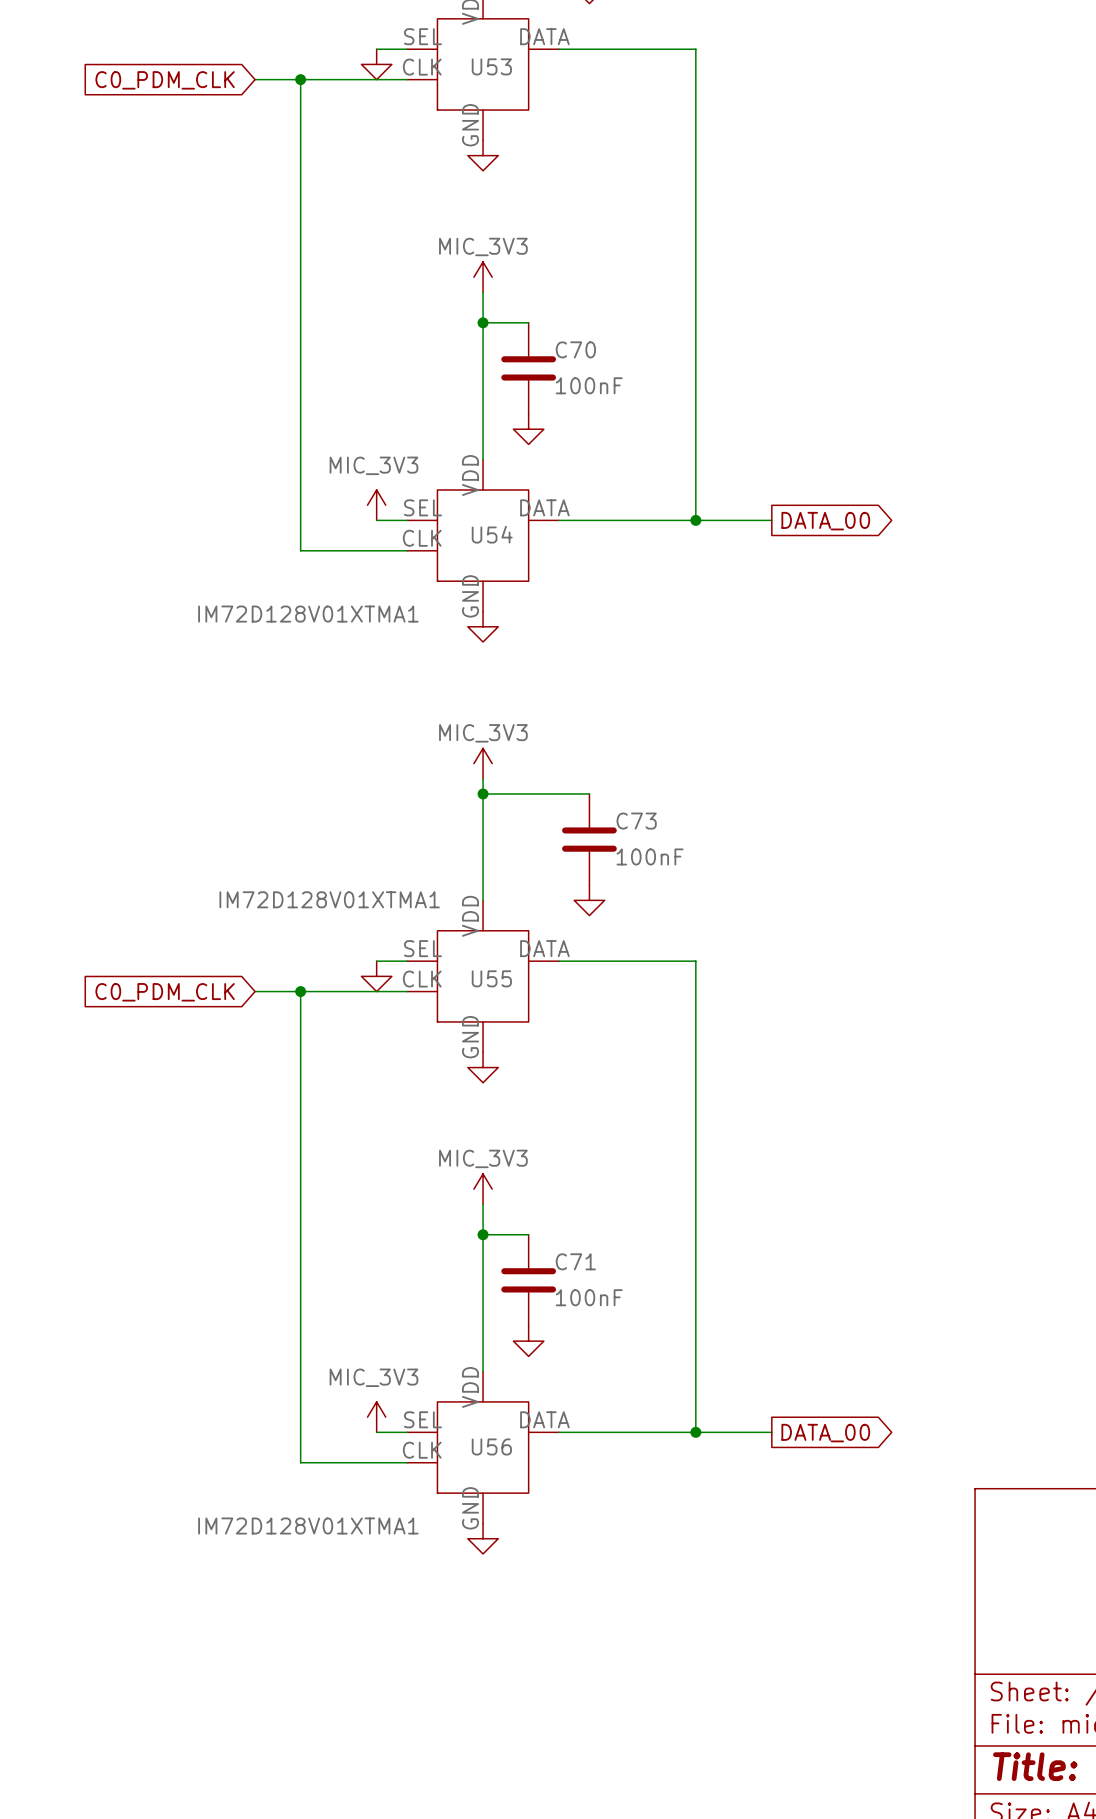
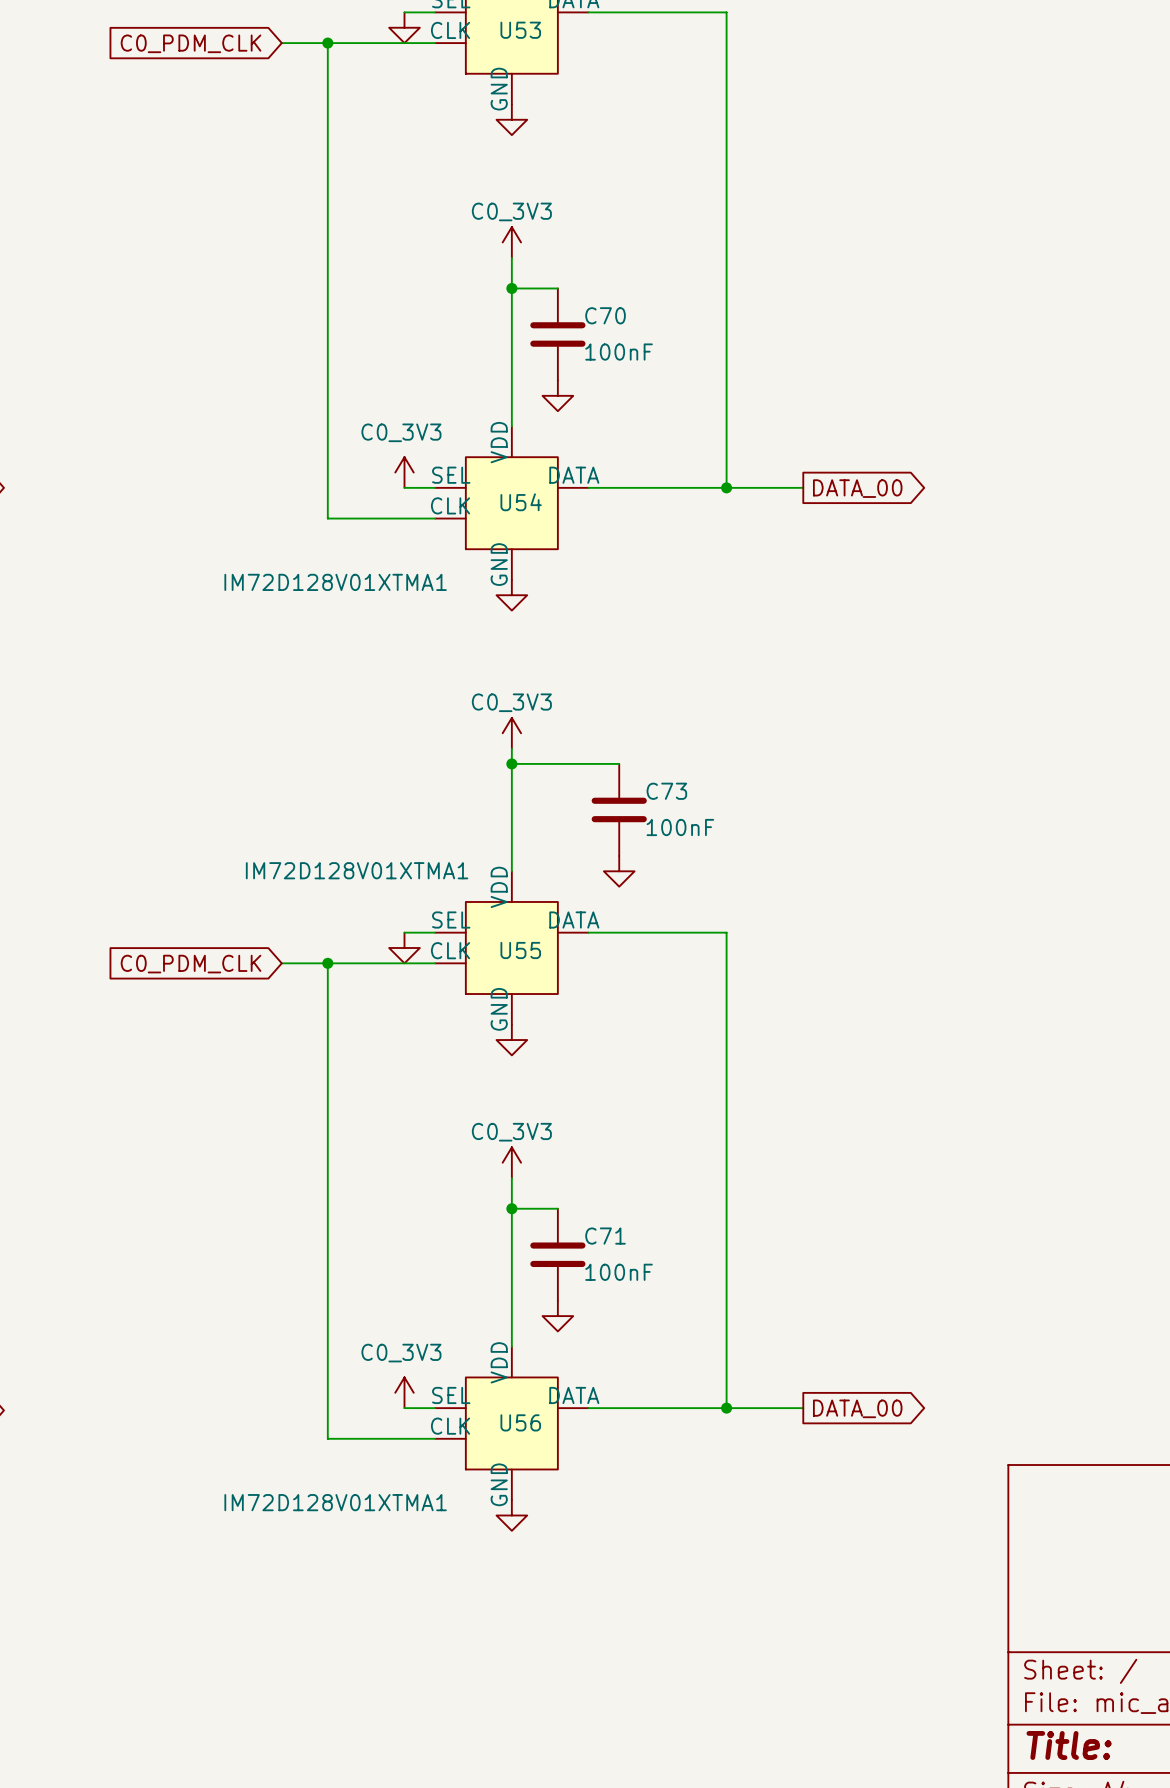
power symbol: MIC_3V3 (483, 277) -> C0_3V3 (511, 242)
power symbol: MIC_3V3 (376, 505) -> C0_3V3 (404, 472)
power symbol: MIC_3V3 (483, 763) -> C0_3V3 (511, 733)
power symbol: MIC_3V3 (483, 1189) -> C0_3V3 (511, 1162)
power symbol: MIC_3V3 (376, 1417) -> C0_3V3 (404, 1392)

